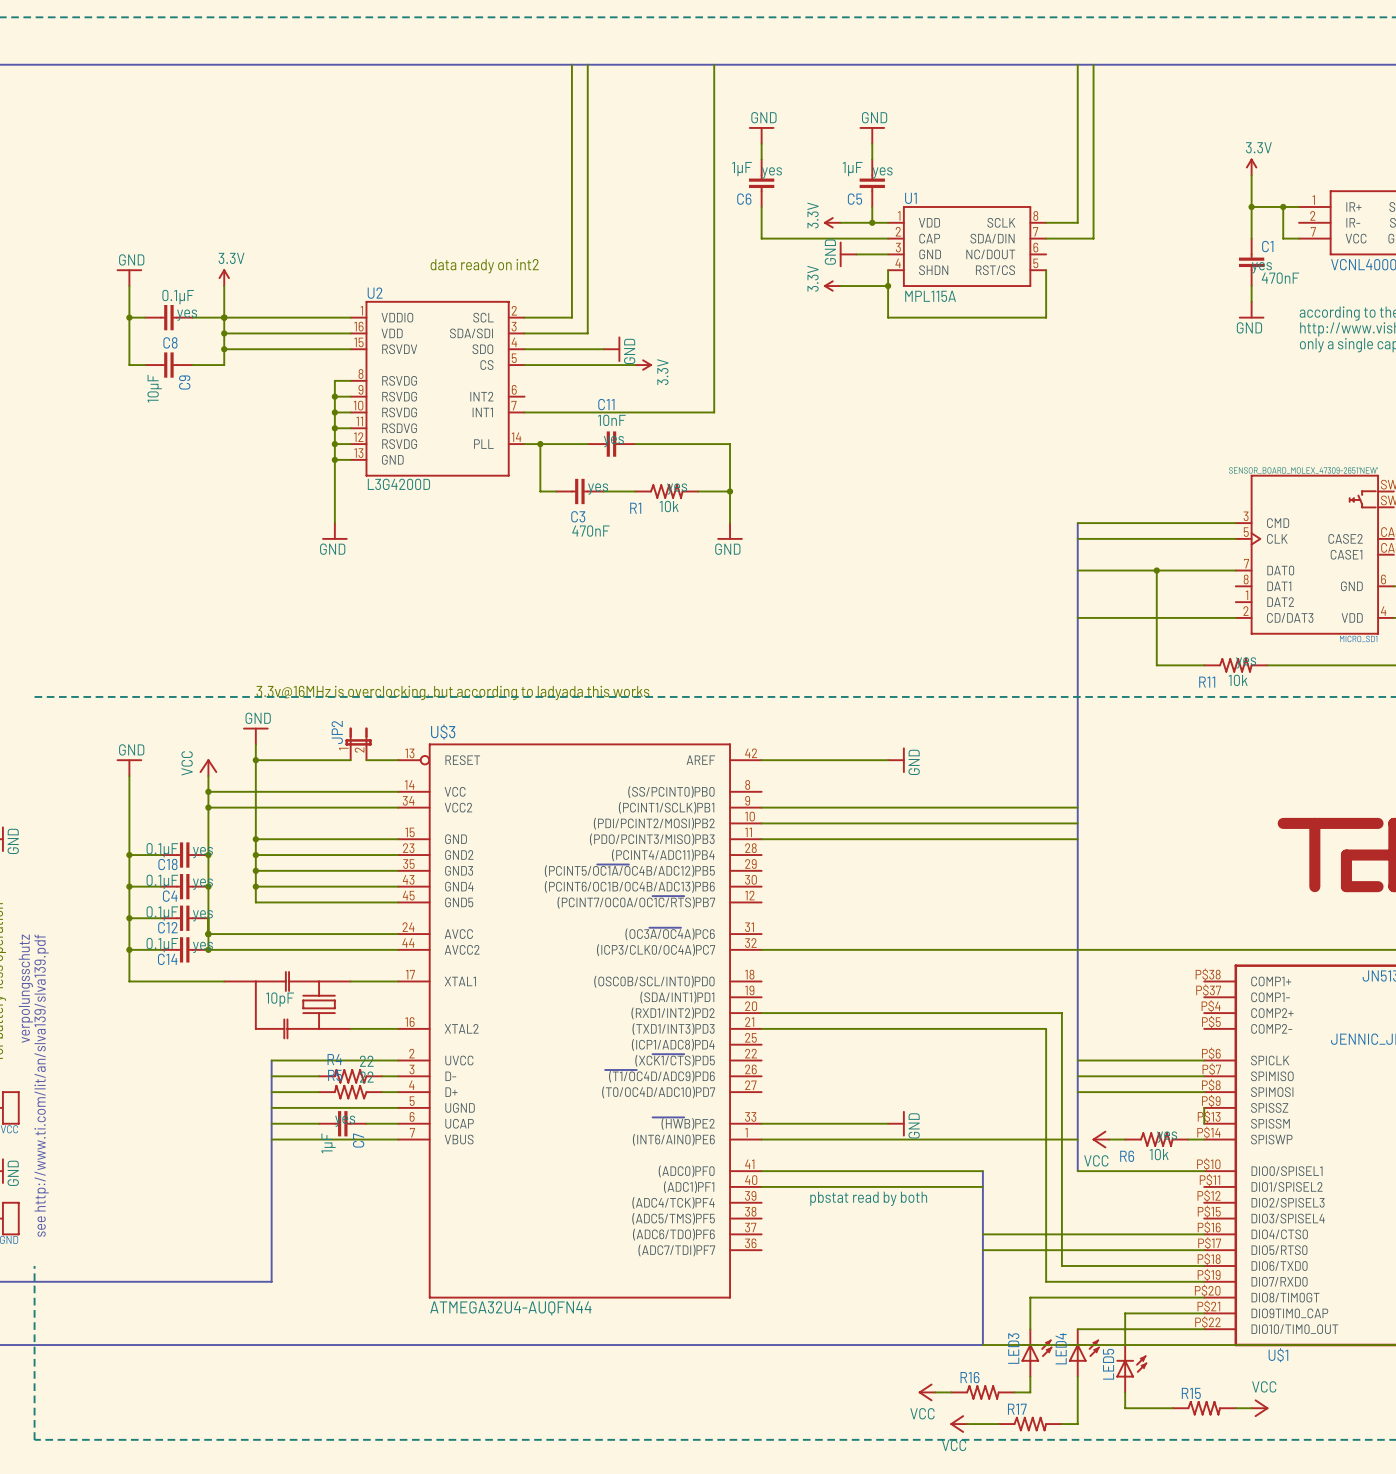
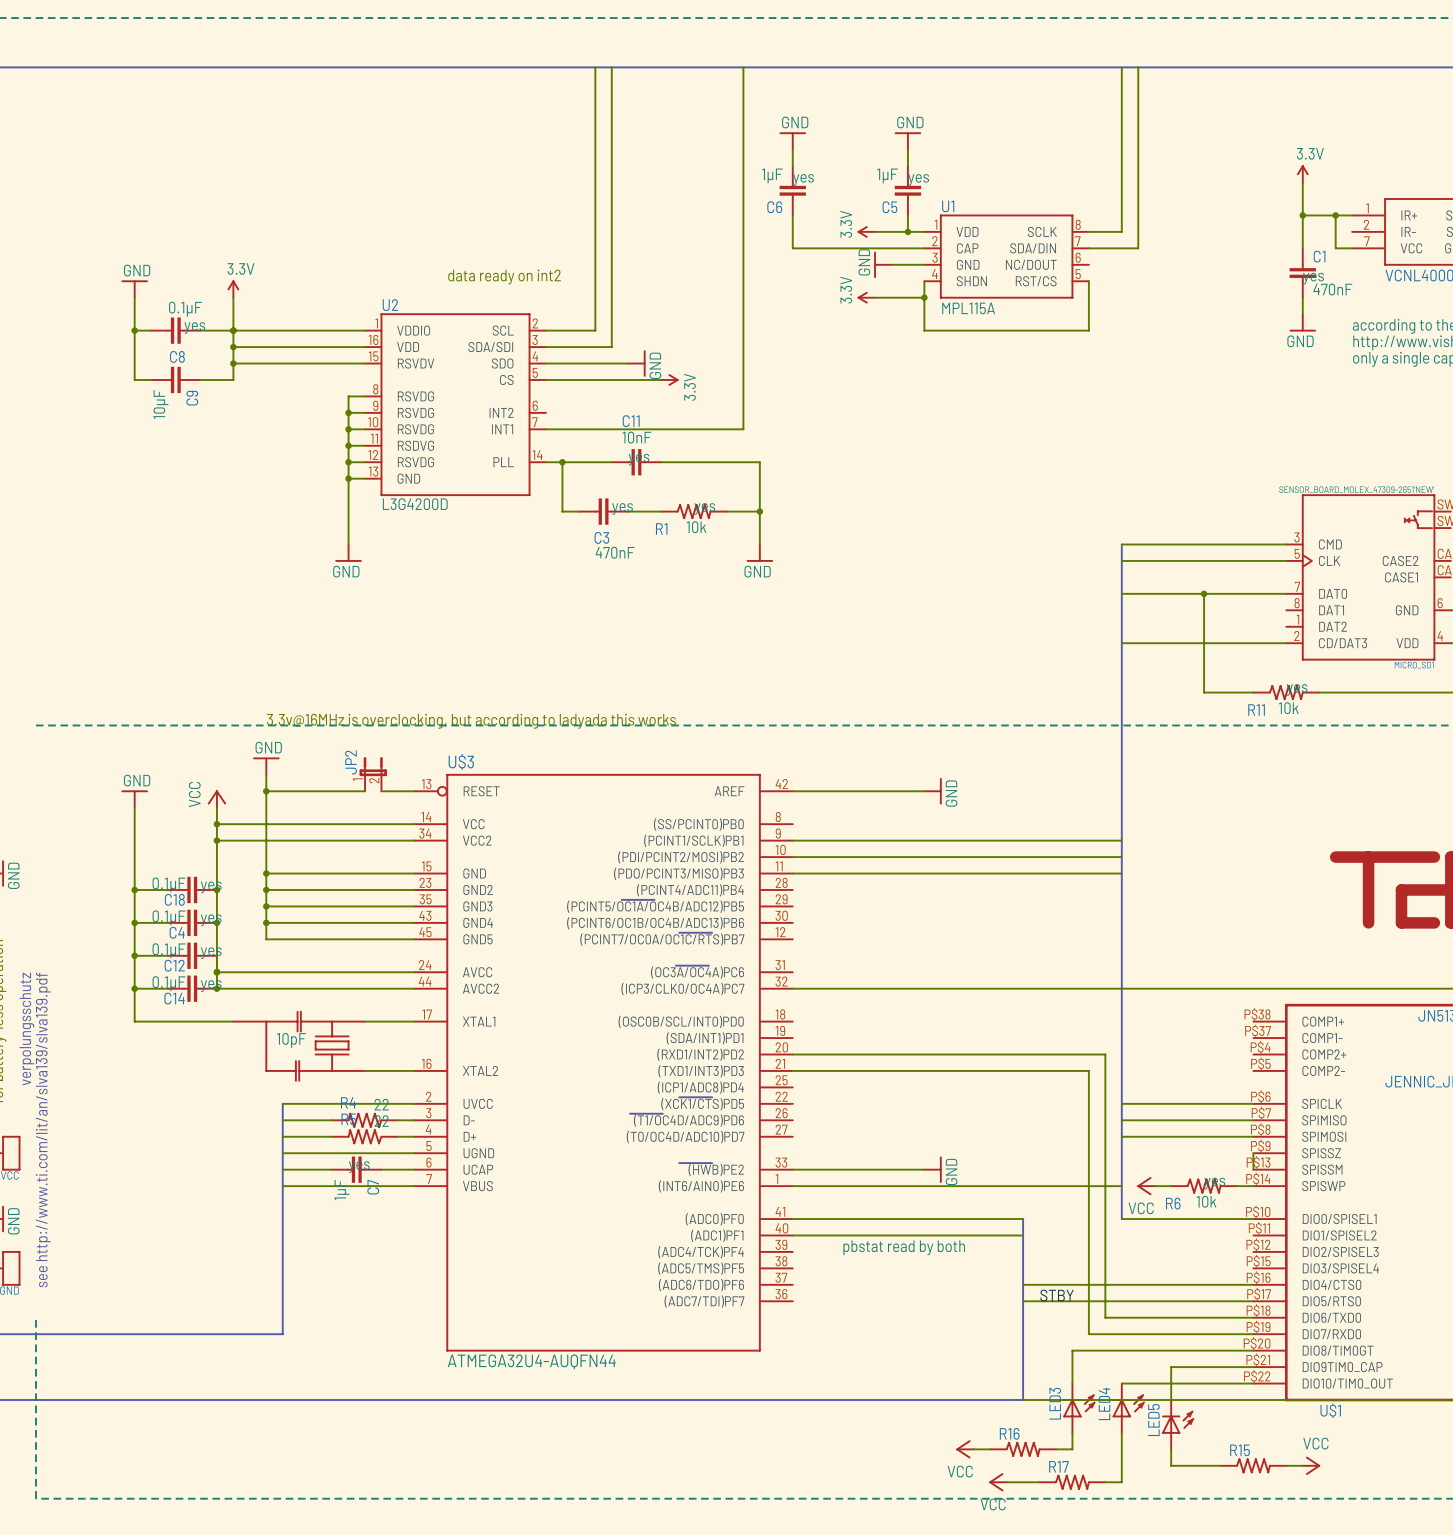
label: none -> STBY (1057, 1295)

